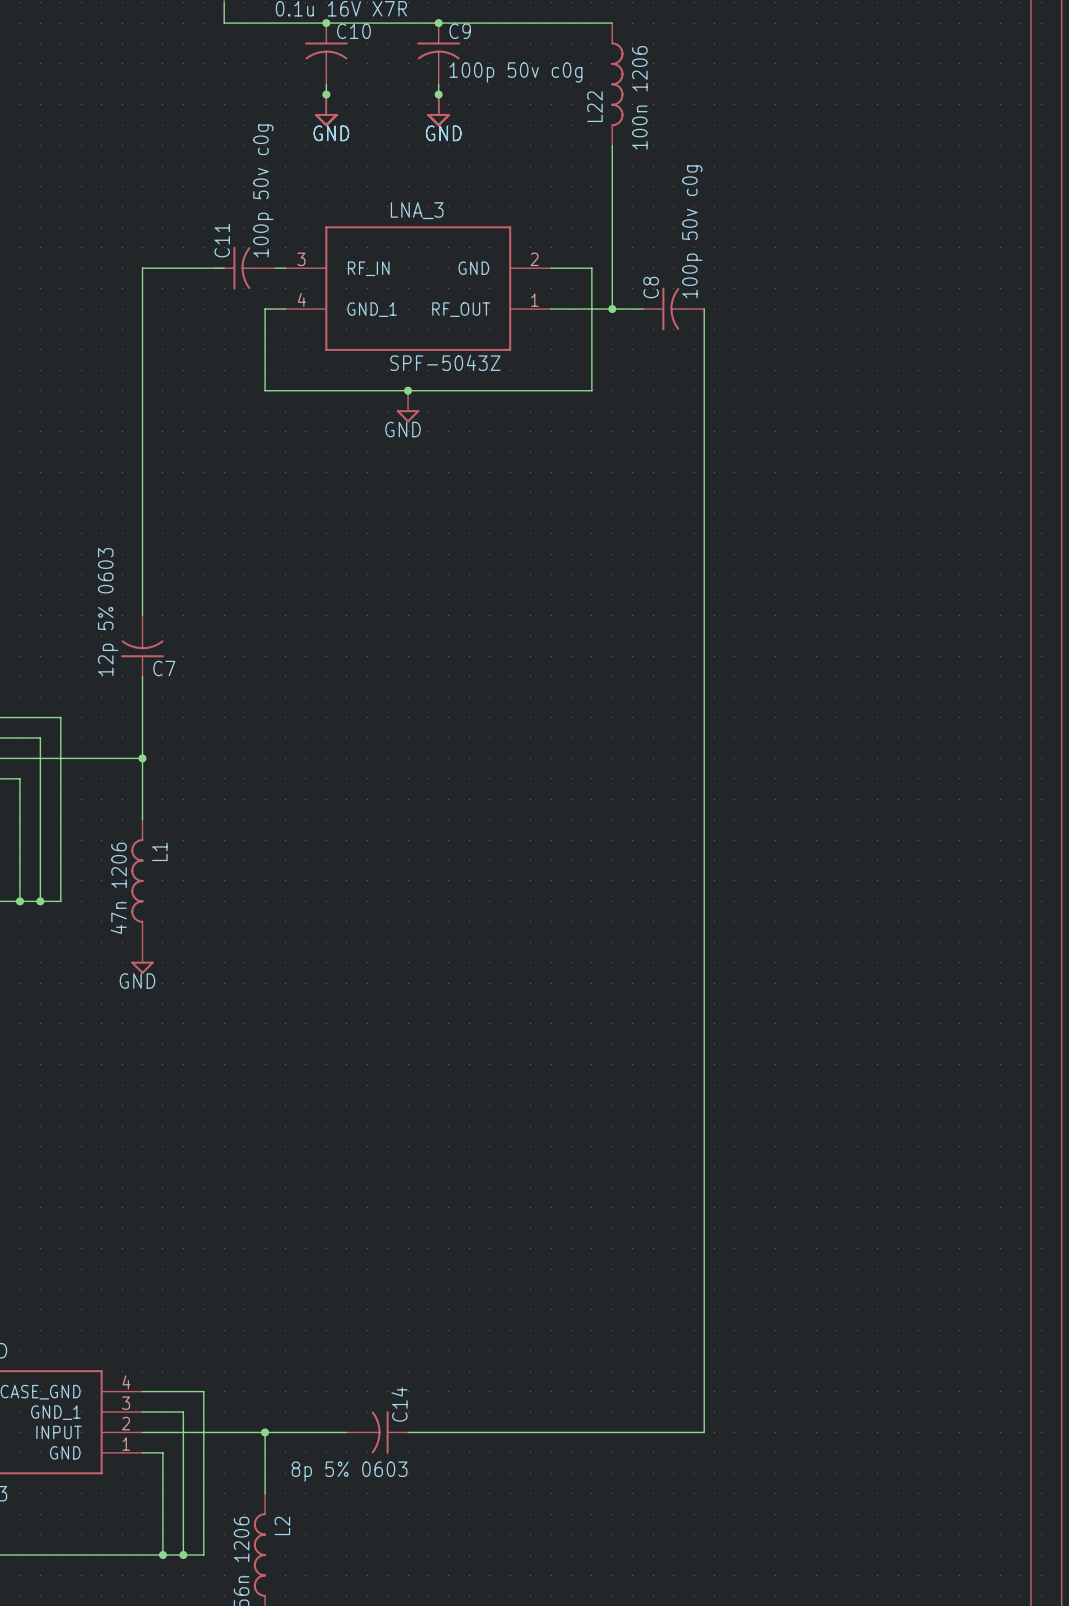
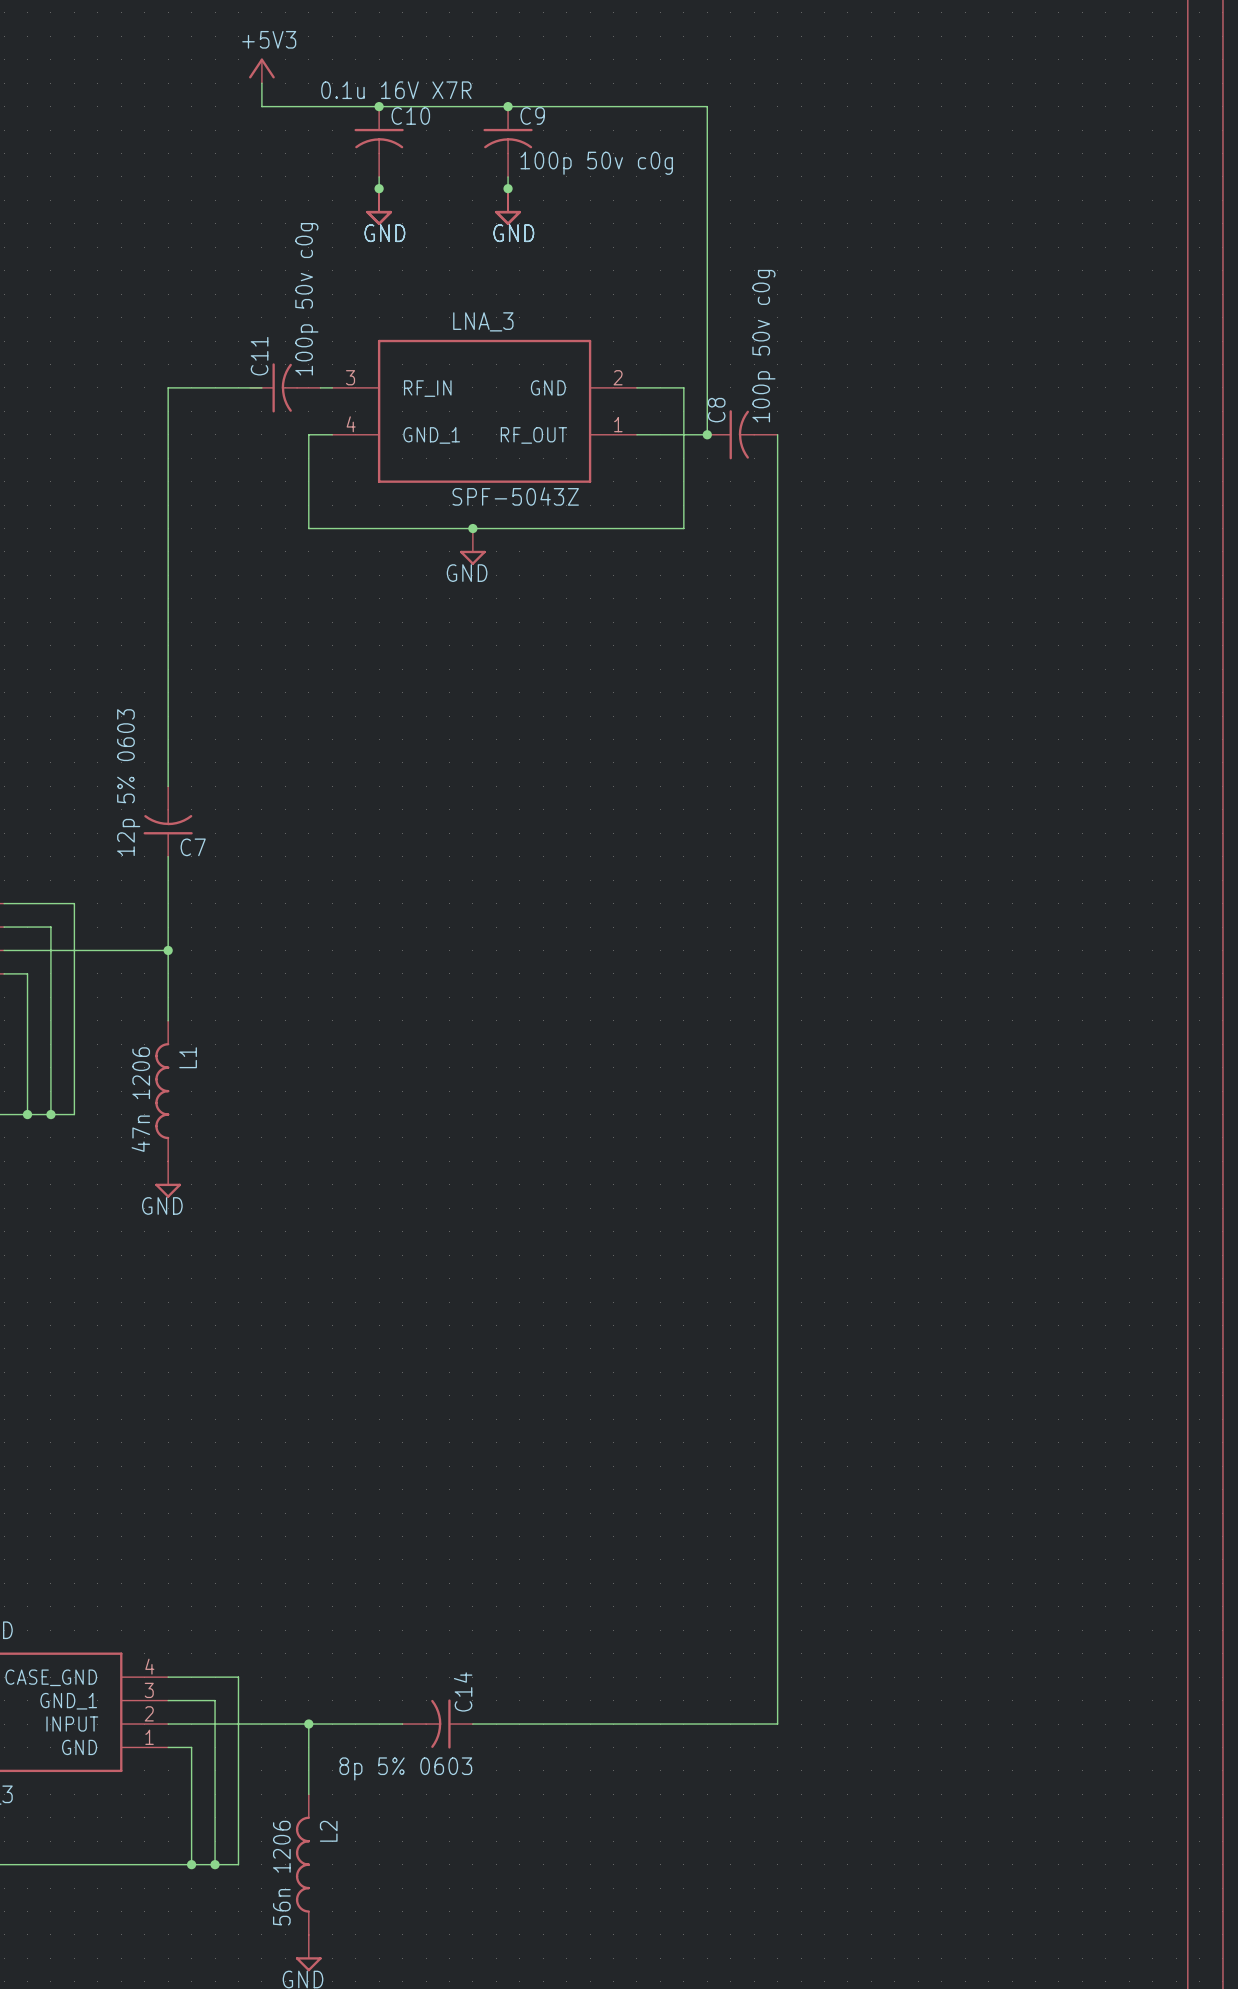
wire: none -> (707, 106) (707, 247)
L22: 100n 1206 (617, 84) -> none
C8 position: (673, 309) -> (742, 434)
wire: (704, 309) (704, 1432) (673, 1432) -> (777, 434) (777, 1724)

